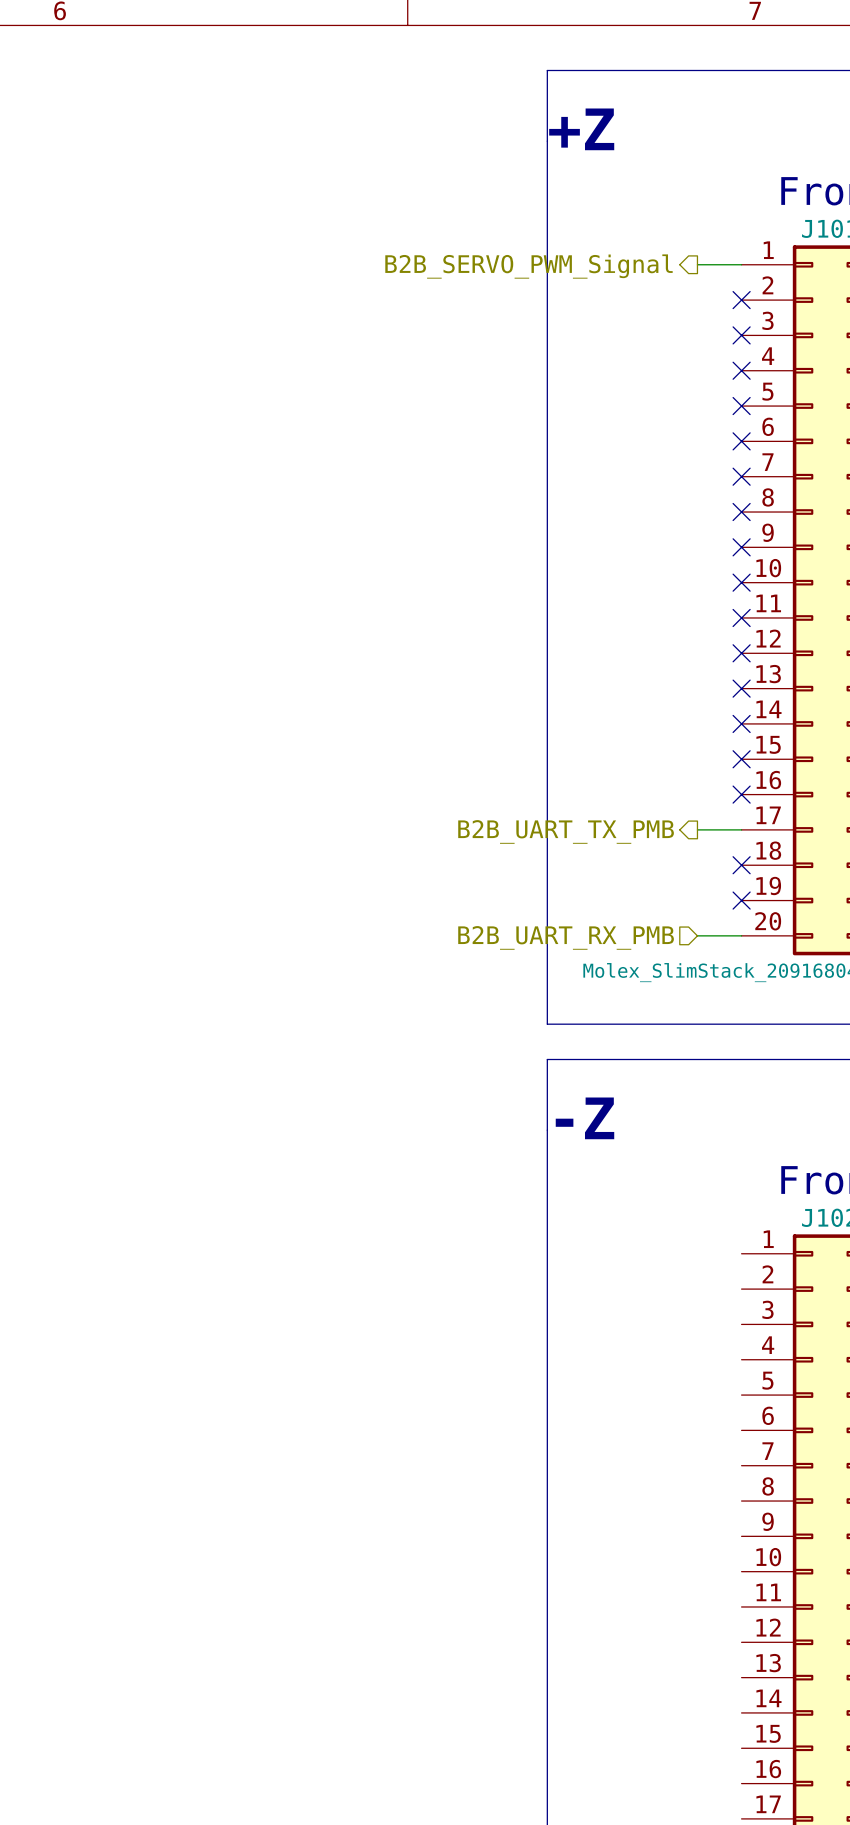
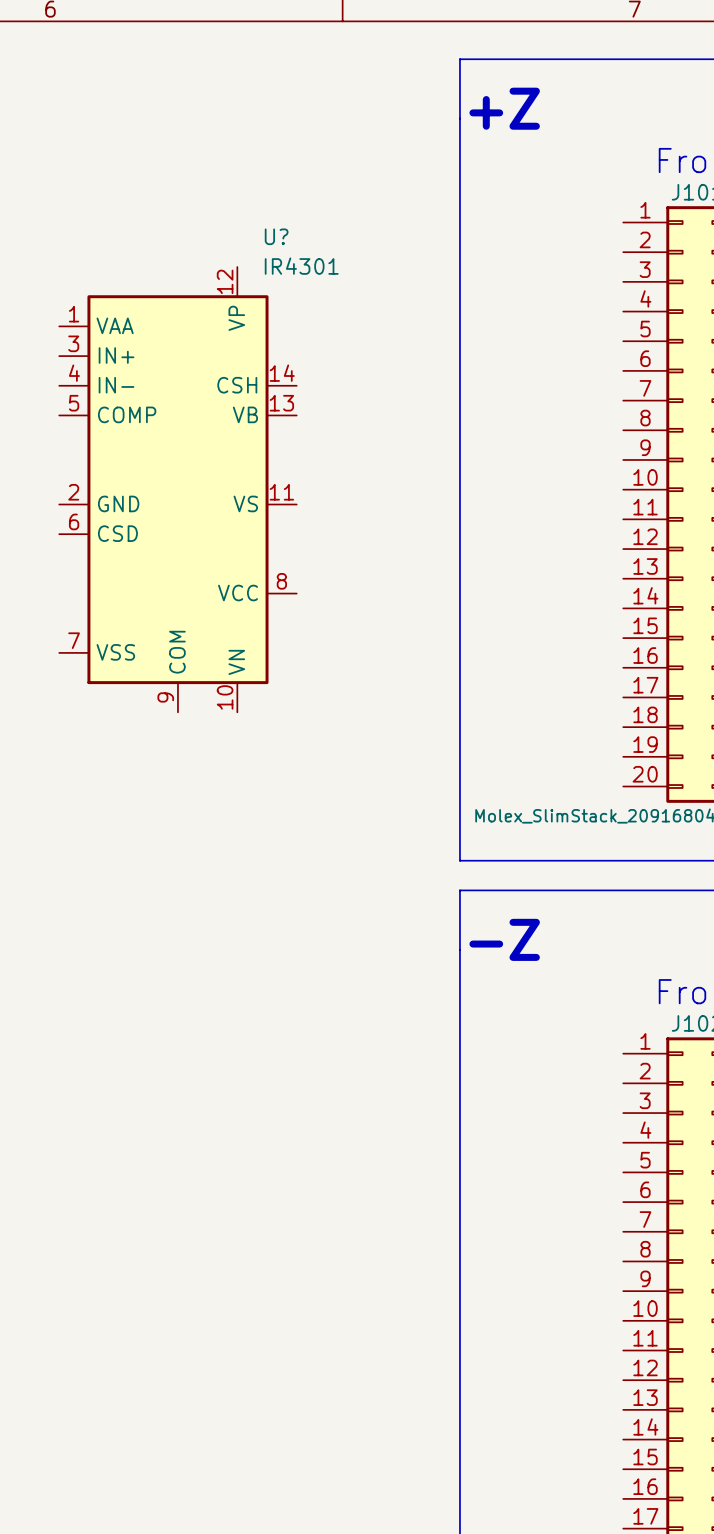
wire: (697, 264) (741, 264) -> none
hierarchical label: B2B_SERVO_PWM_Signal (528, 266) -> none
no-connect mark: (741, 300) -> none
no-connect mark: (741, 335) -> none
no-connect mark: (741, 370) -> none
no-connect mark: (741, 406) -> none
no-connect mark: (741, 441) -> none
no-connect mark: (741, 476) -> none
no-connect mark: (741, 512) -> none
no-connect mark: (741, 547) -> none
U?: none -> IR4301 (177, 489)
no-connect mark: (741, 582) -> none
no-connect mark: (741, 617) -> none
no-connect mark: (741, 653) -> none
no-connect mark: (741, 688) -> none
no-connect mark: (741, 723) -> none
no-connect mark: (741, 759) -> none
no-connect mark: (741, 794) -> none
wire: (697, 829) (741, 829) -> none
hierarchical label: B2B_UART_TX_PMB (566, 831) -> none
no-connect mark: (741, 865) -> none
no-connect mark: (741, 900) -> none
wire: (697, 935) (741, 935) -> none
hierarchical label: B2B_UART_RX_PMB (566, 937) -> none

